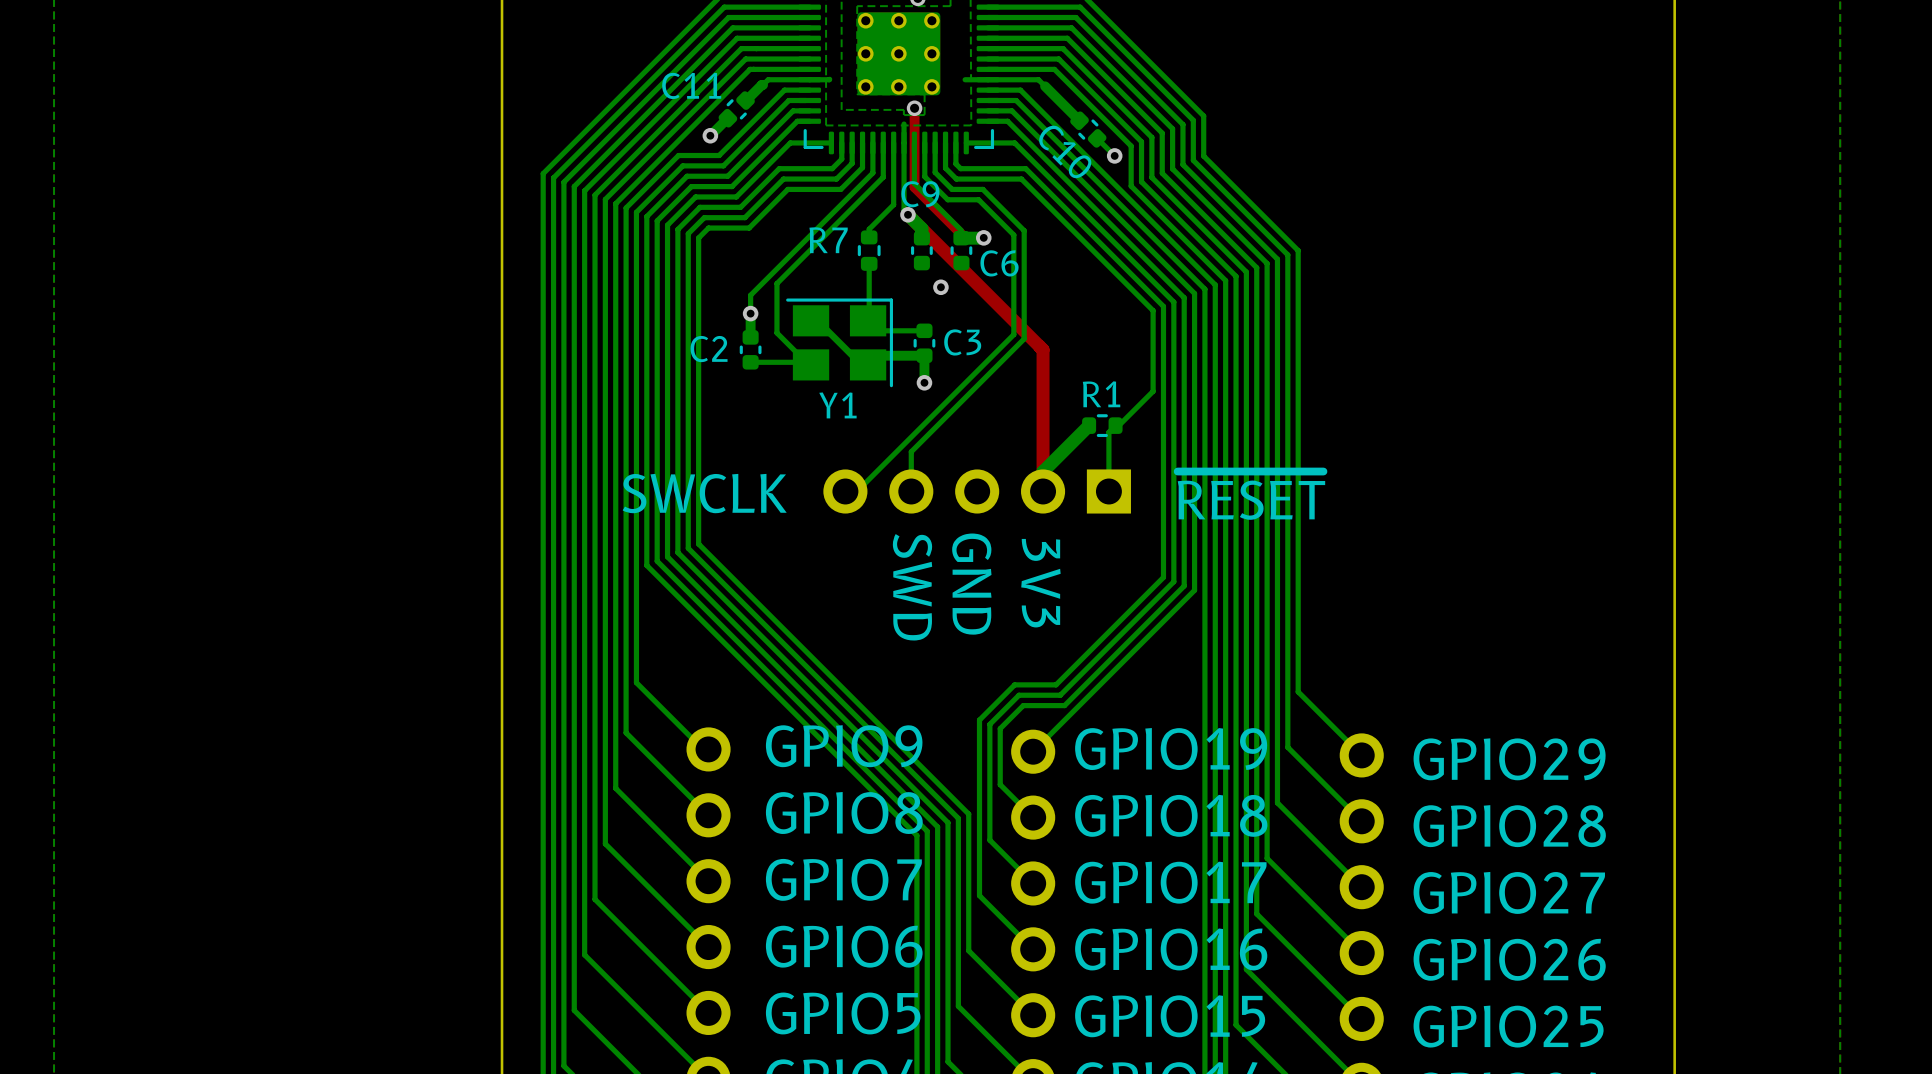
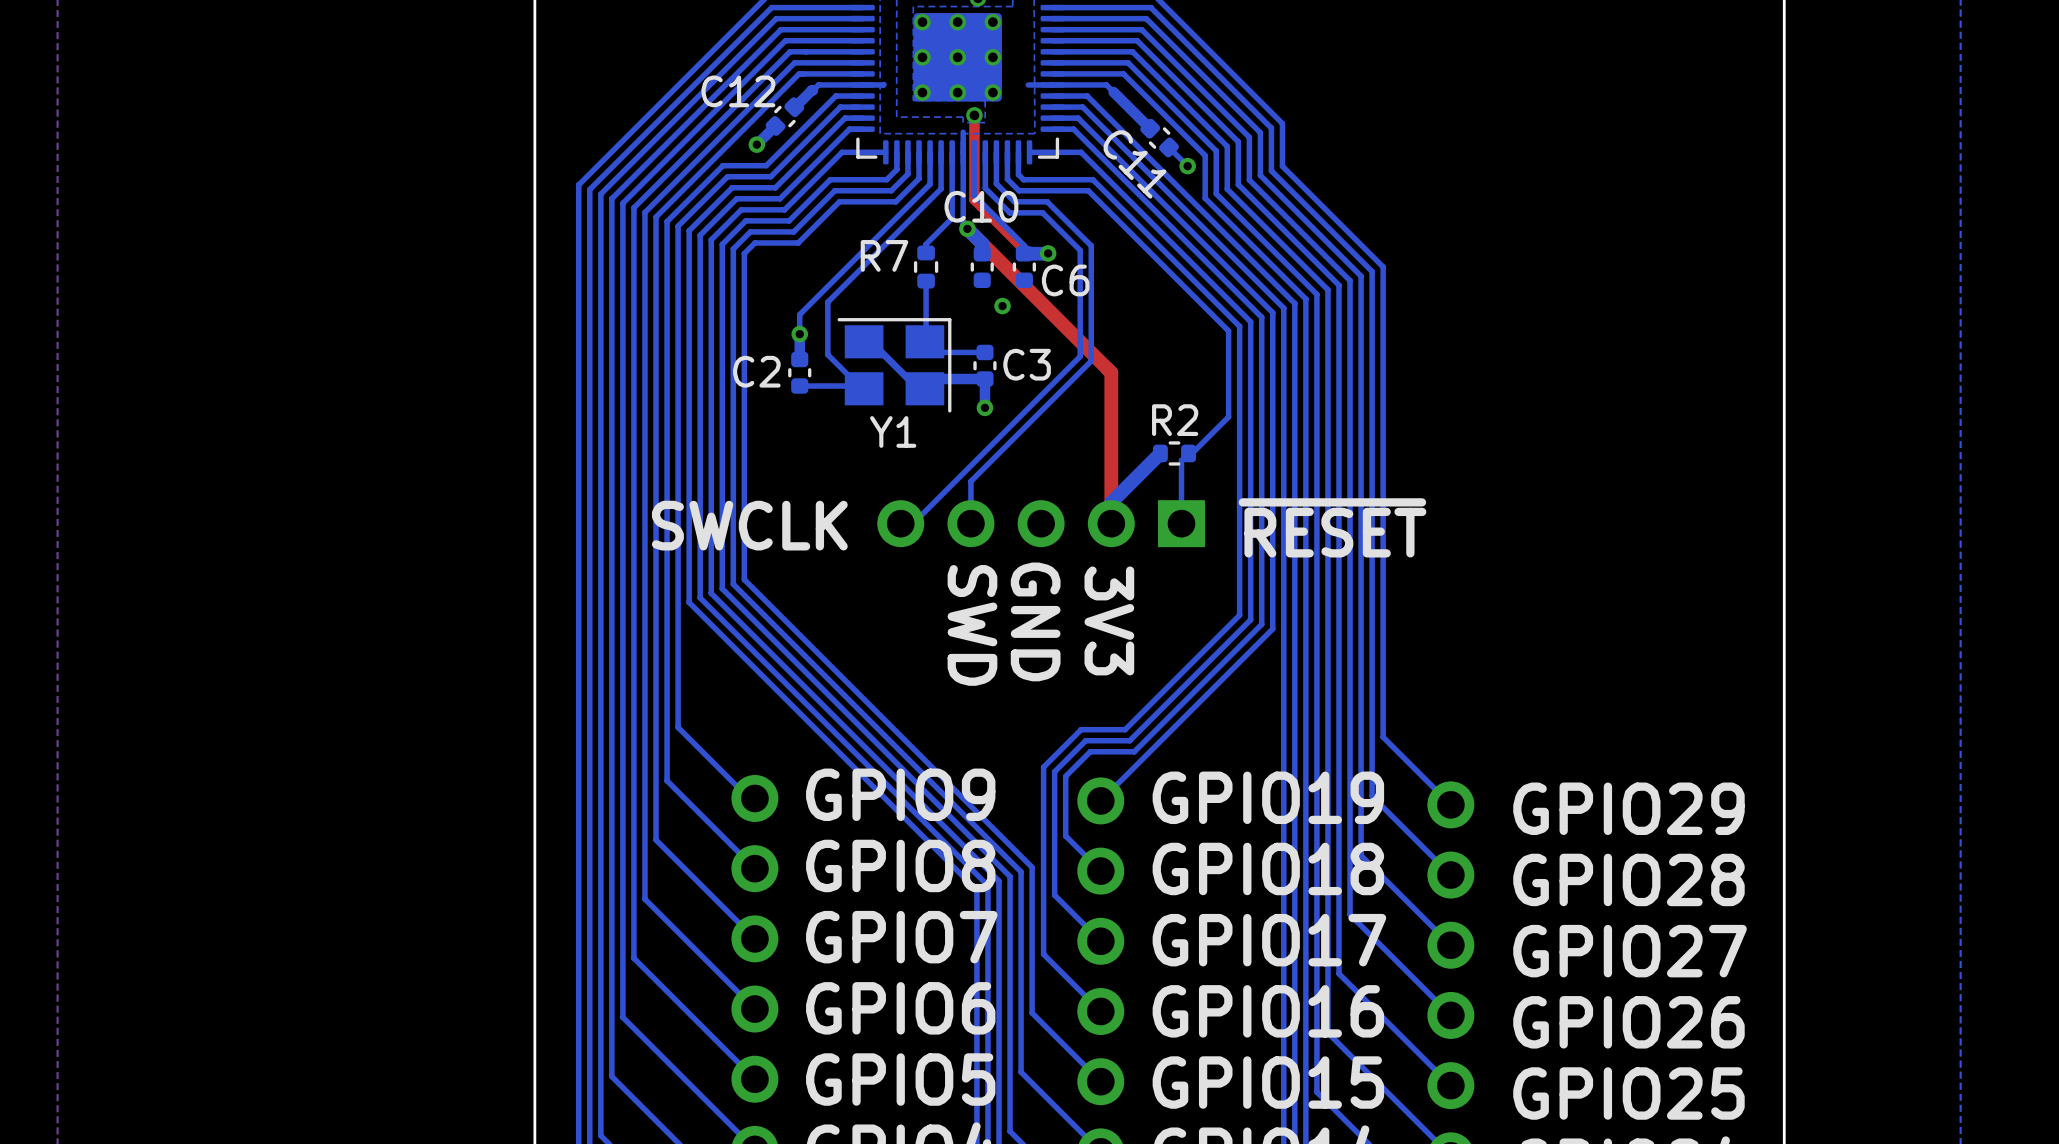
C11 name: C11 (691, 85) -> C12 (738, 91)
C10 name: C10 (1065, 151) -> C11 (1135, 164)
C9 name: C9 (920, 194) -> C10 (981, 206)
R1 name: R1 (1101, 394) -> R2 (1175, 420)

